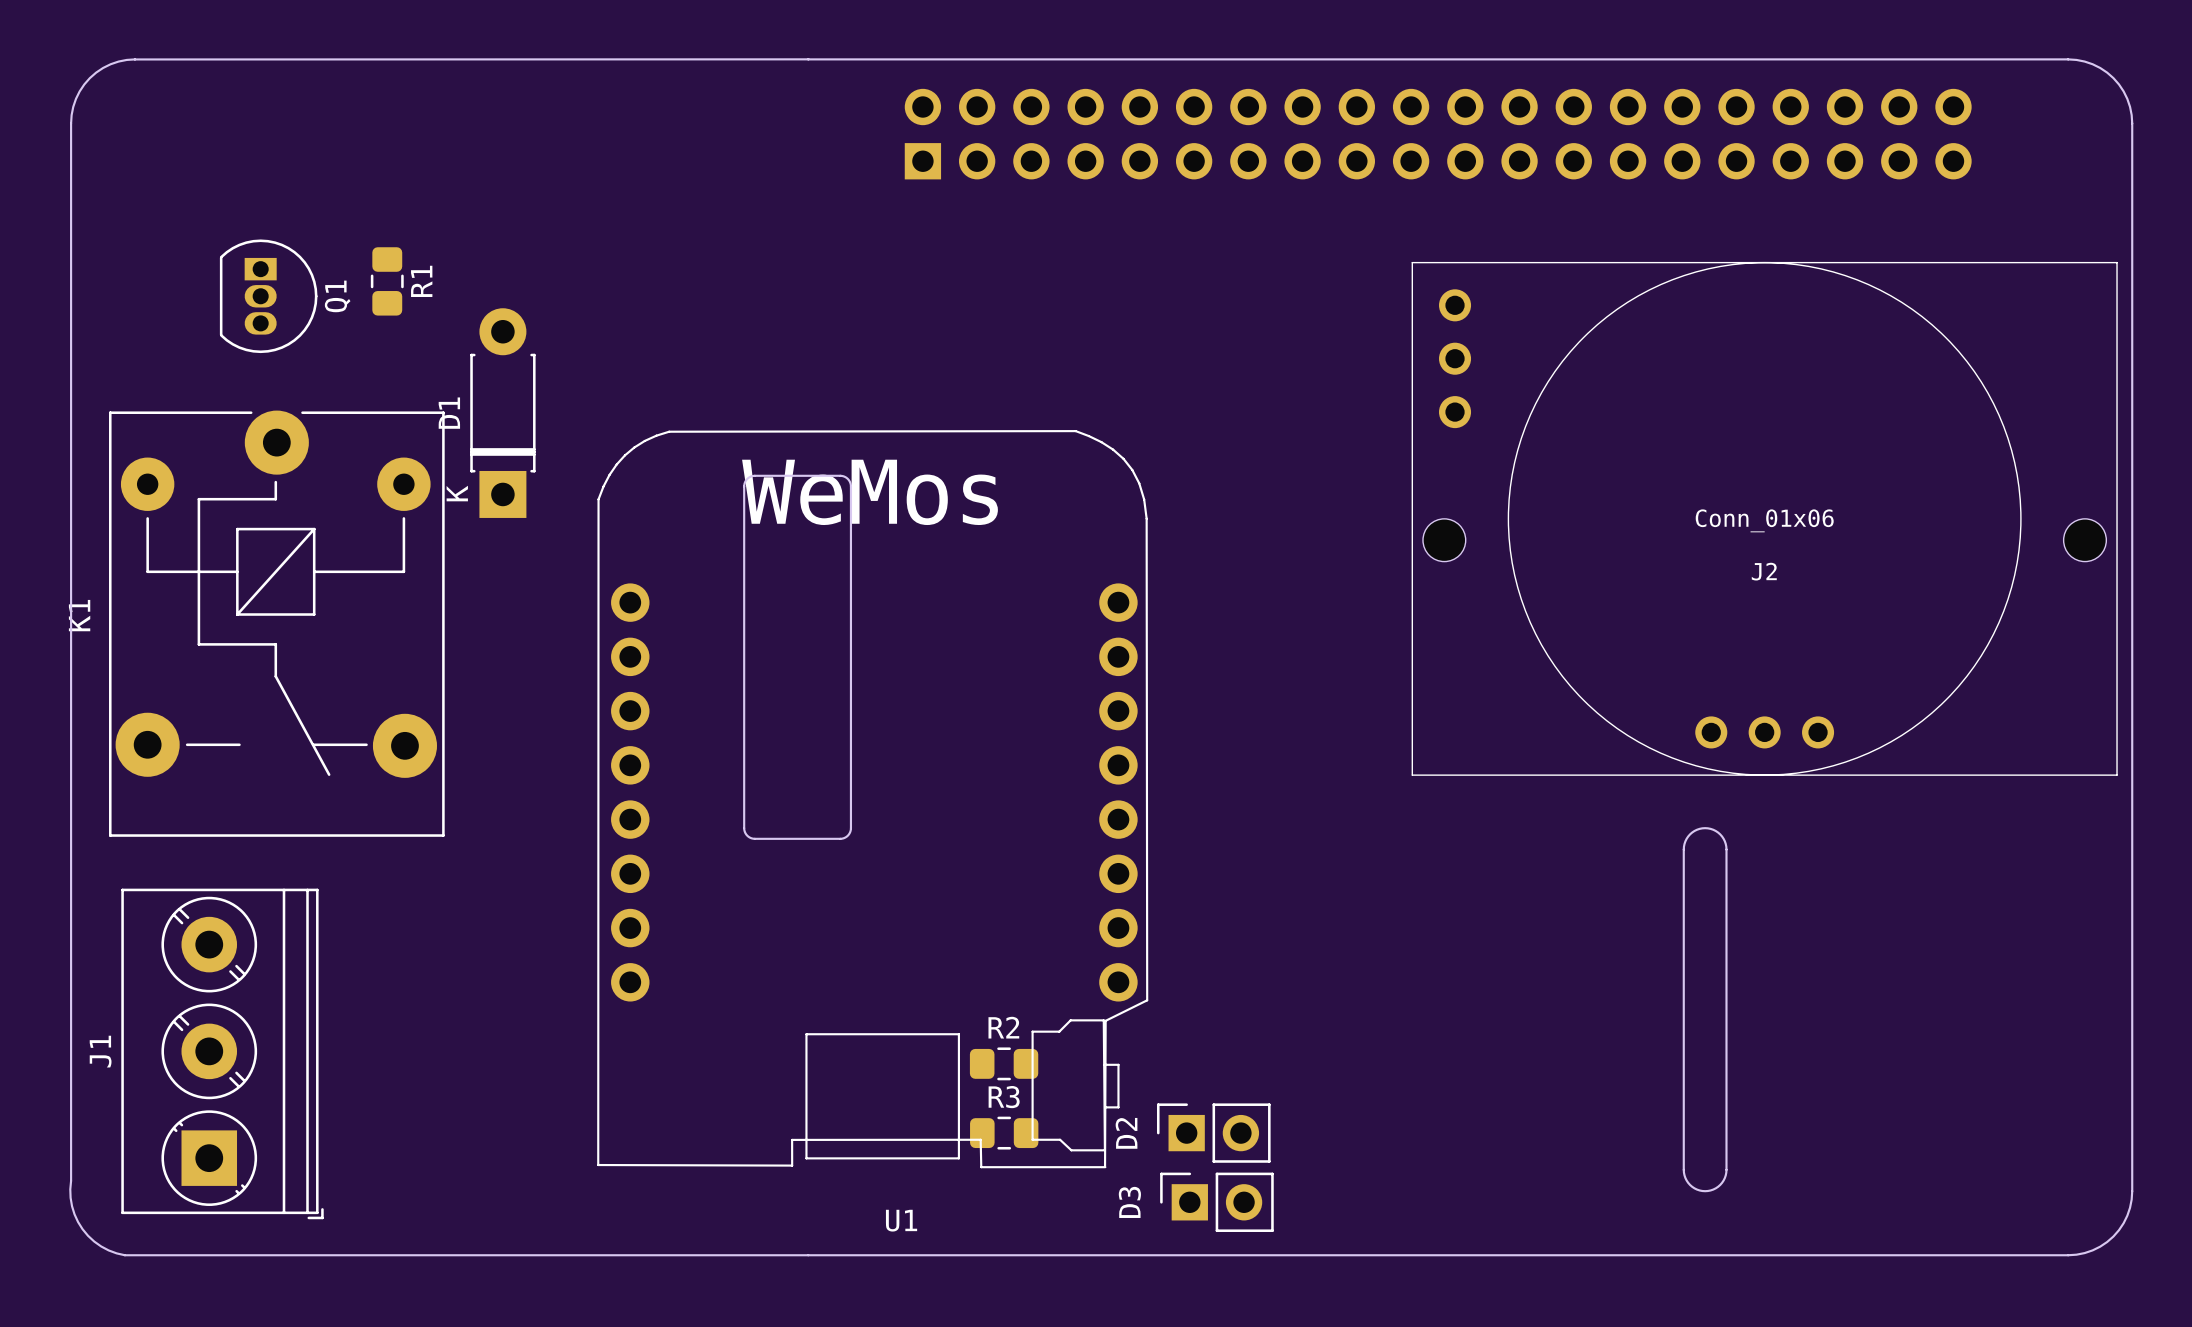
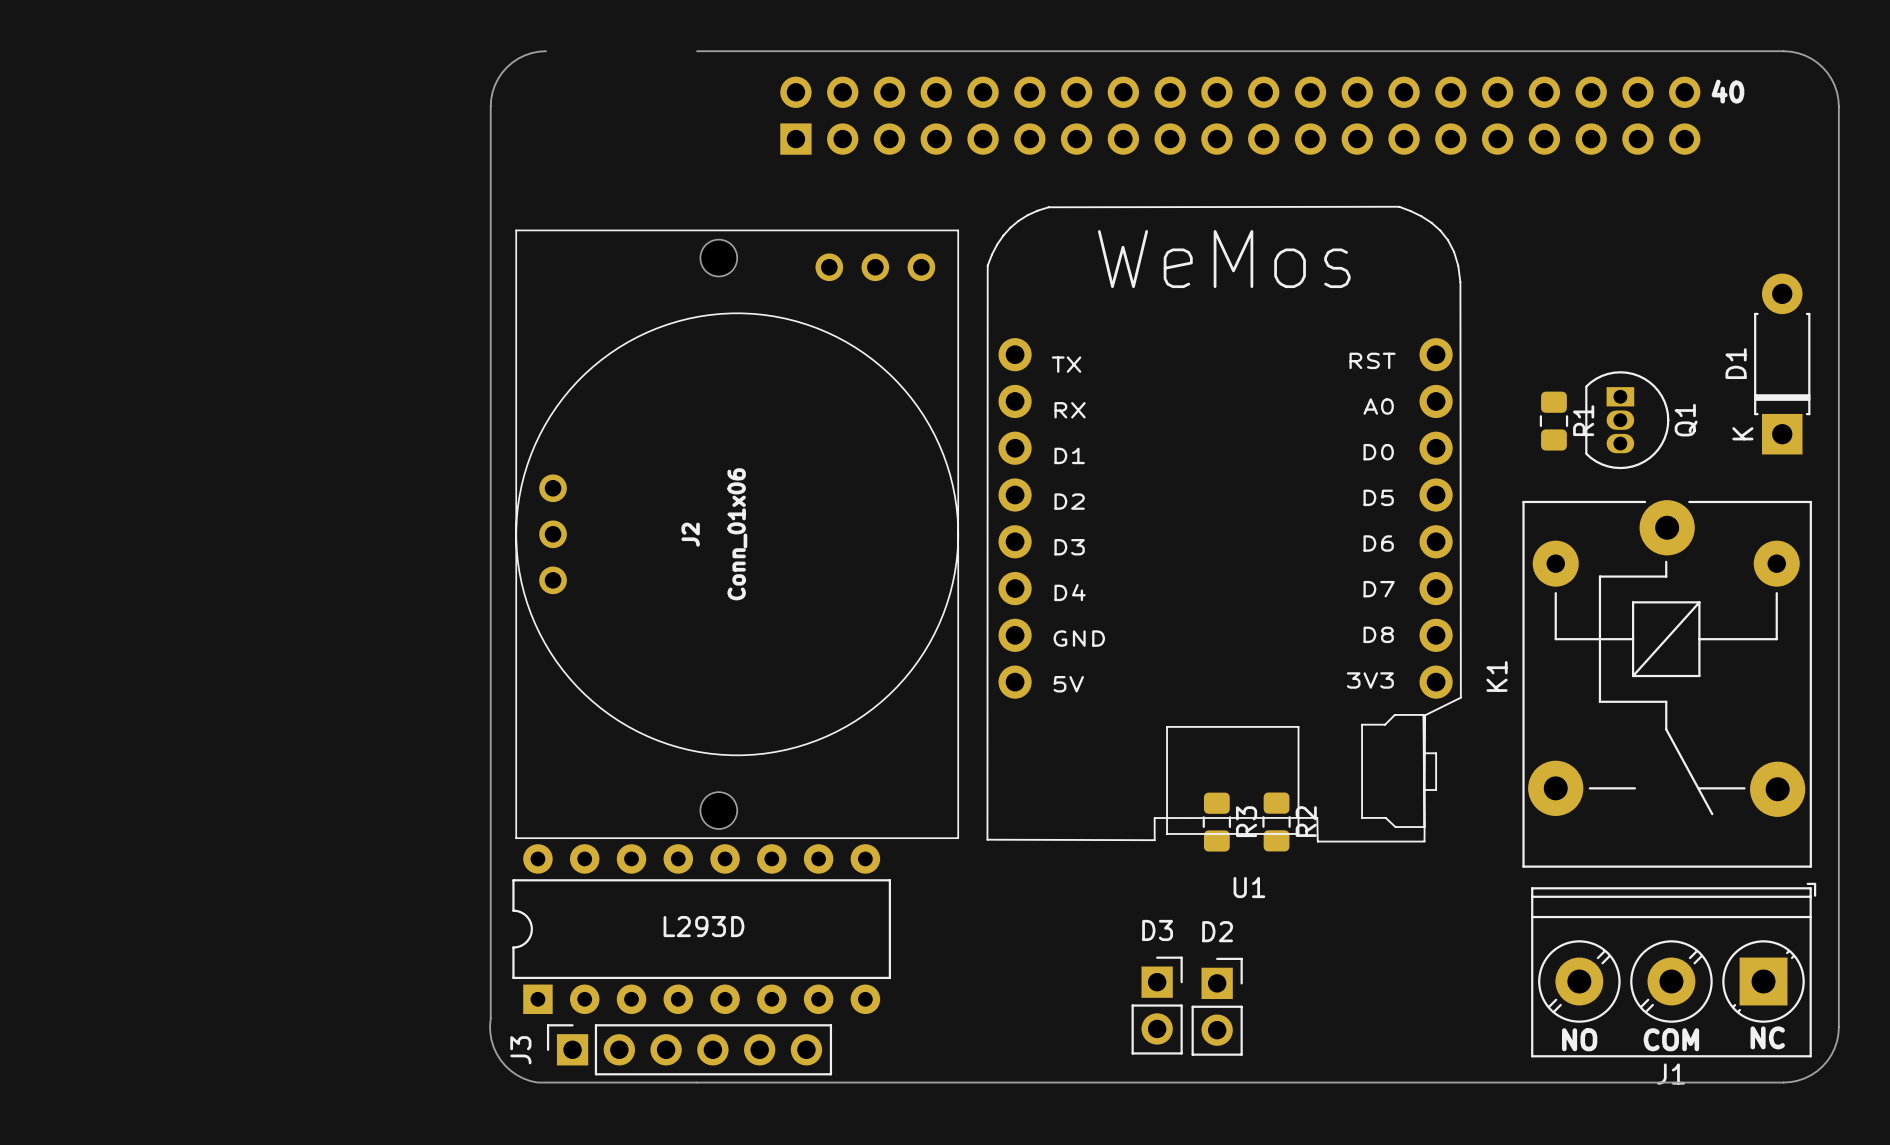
board edge: (134, 59) (808, 59) -> none
board edge: (135, 59) (110, 64) (89, 78) (75, 98) (71, 123) (70, 1189) (74, 1214) (82, 1229) (94, 1241) (108, 1250) (124, 1255) (623, 1255) -> none
board edge: none -> (545, 51) (524, 55) (506, 67) (494, 85) (490, 106) (490, 1033) (496, 1053) (505, 1065) (516, 1074) (537, 1082)
text: none -> 40 (1727, 91)
R1 position: (387, 281) -> (1553, 421)
Q1 position: (268, 296) -> (1627, 420)
D1 position: (502, 413) -> (1782, 364)
text: none -> RST (1372, 360)
text: none -> TX (1066, 364)
text: none -> A0 (1378, 406)
board edge: (754, 475) (841, 475) (846, 478) (850, 483) (850, 828) (848, 834) (843, 838) (753, 838) (748, 836) (744, 830) (744, 486) (747, 478) (754, 475) -> none
text: none -> RX (1070, 410)
J2 rotation: 0° (1764, 518) -> 90° clockwise (737, 534)
J2 position: (1764, 518) -> (737, 534)
text: none -> D0 (1378, 452)
text: none -> D1 (1069, 455)
text: none -> D5 (1378, 497)
text: none -> D2 (1069, 501)
K1 position: (276, 623) -> (1667, 683)
text: none -> D6 (1378, 543)
text: none -> D3 (1069, 547)
text: none -> D7 (1379, 589)
text: none -> D4 (1070, 592)
text: none -> D8 (1378, 634)
text: none -> GND (1079, 638)
text: none -> 3V3 (1370, 680)
text: none -> 5V (1068, 684)
U1 position: (872, 799) -> (1224, 524)
board edge: (1683, 849) (1683, 1172) (1686, 1180) (1692, 1186) (1699, 1190) (1707, 1190) (1715, 1188) (1722, 1182) (1726, 1169) (1726, 846) (1723, 838) (1718, 832) (1710, 828) (1702, 828) (1694, 831) (1688, 836) (1683, 849) -> none
J1 rotation: 0° (222, 1053) -> 90° counterclockwise (1673, 970)
J1 position: (222, 1053) -> (1673, 970)
R2 rotation: 0° (1004, 1063) -> 90° clockwise (1276, 821)
R2 position: (1004, 1063) -> (1276, 821)
L293D: none -> (701, 929)
R3 rotation: 0° (1004, 1133) -> 90° clockwise (1216, 822)
R3 position: (1004, 1133) -> (1216, 822)
D2 rotation: 0° (1213, 1133) -> 90° clockwise (1217, 1006)
D2 position: (1213, 1133) -> (1217, 1006)
D3 rotation: 0° (1216, 1202) -> 90° clockwise (1157, 1005)
D3 position: (1216, 1202) -> (1157, 1005)
text: none -> NC (1767, 1037)
text: none -> NO (1579, 1039)
text: none -> COM (1671, 1039)
J3: none -> (689, 1049)

